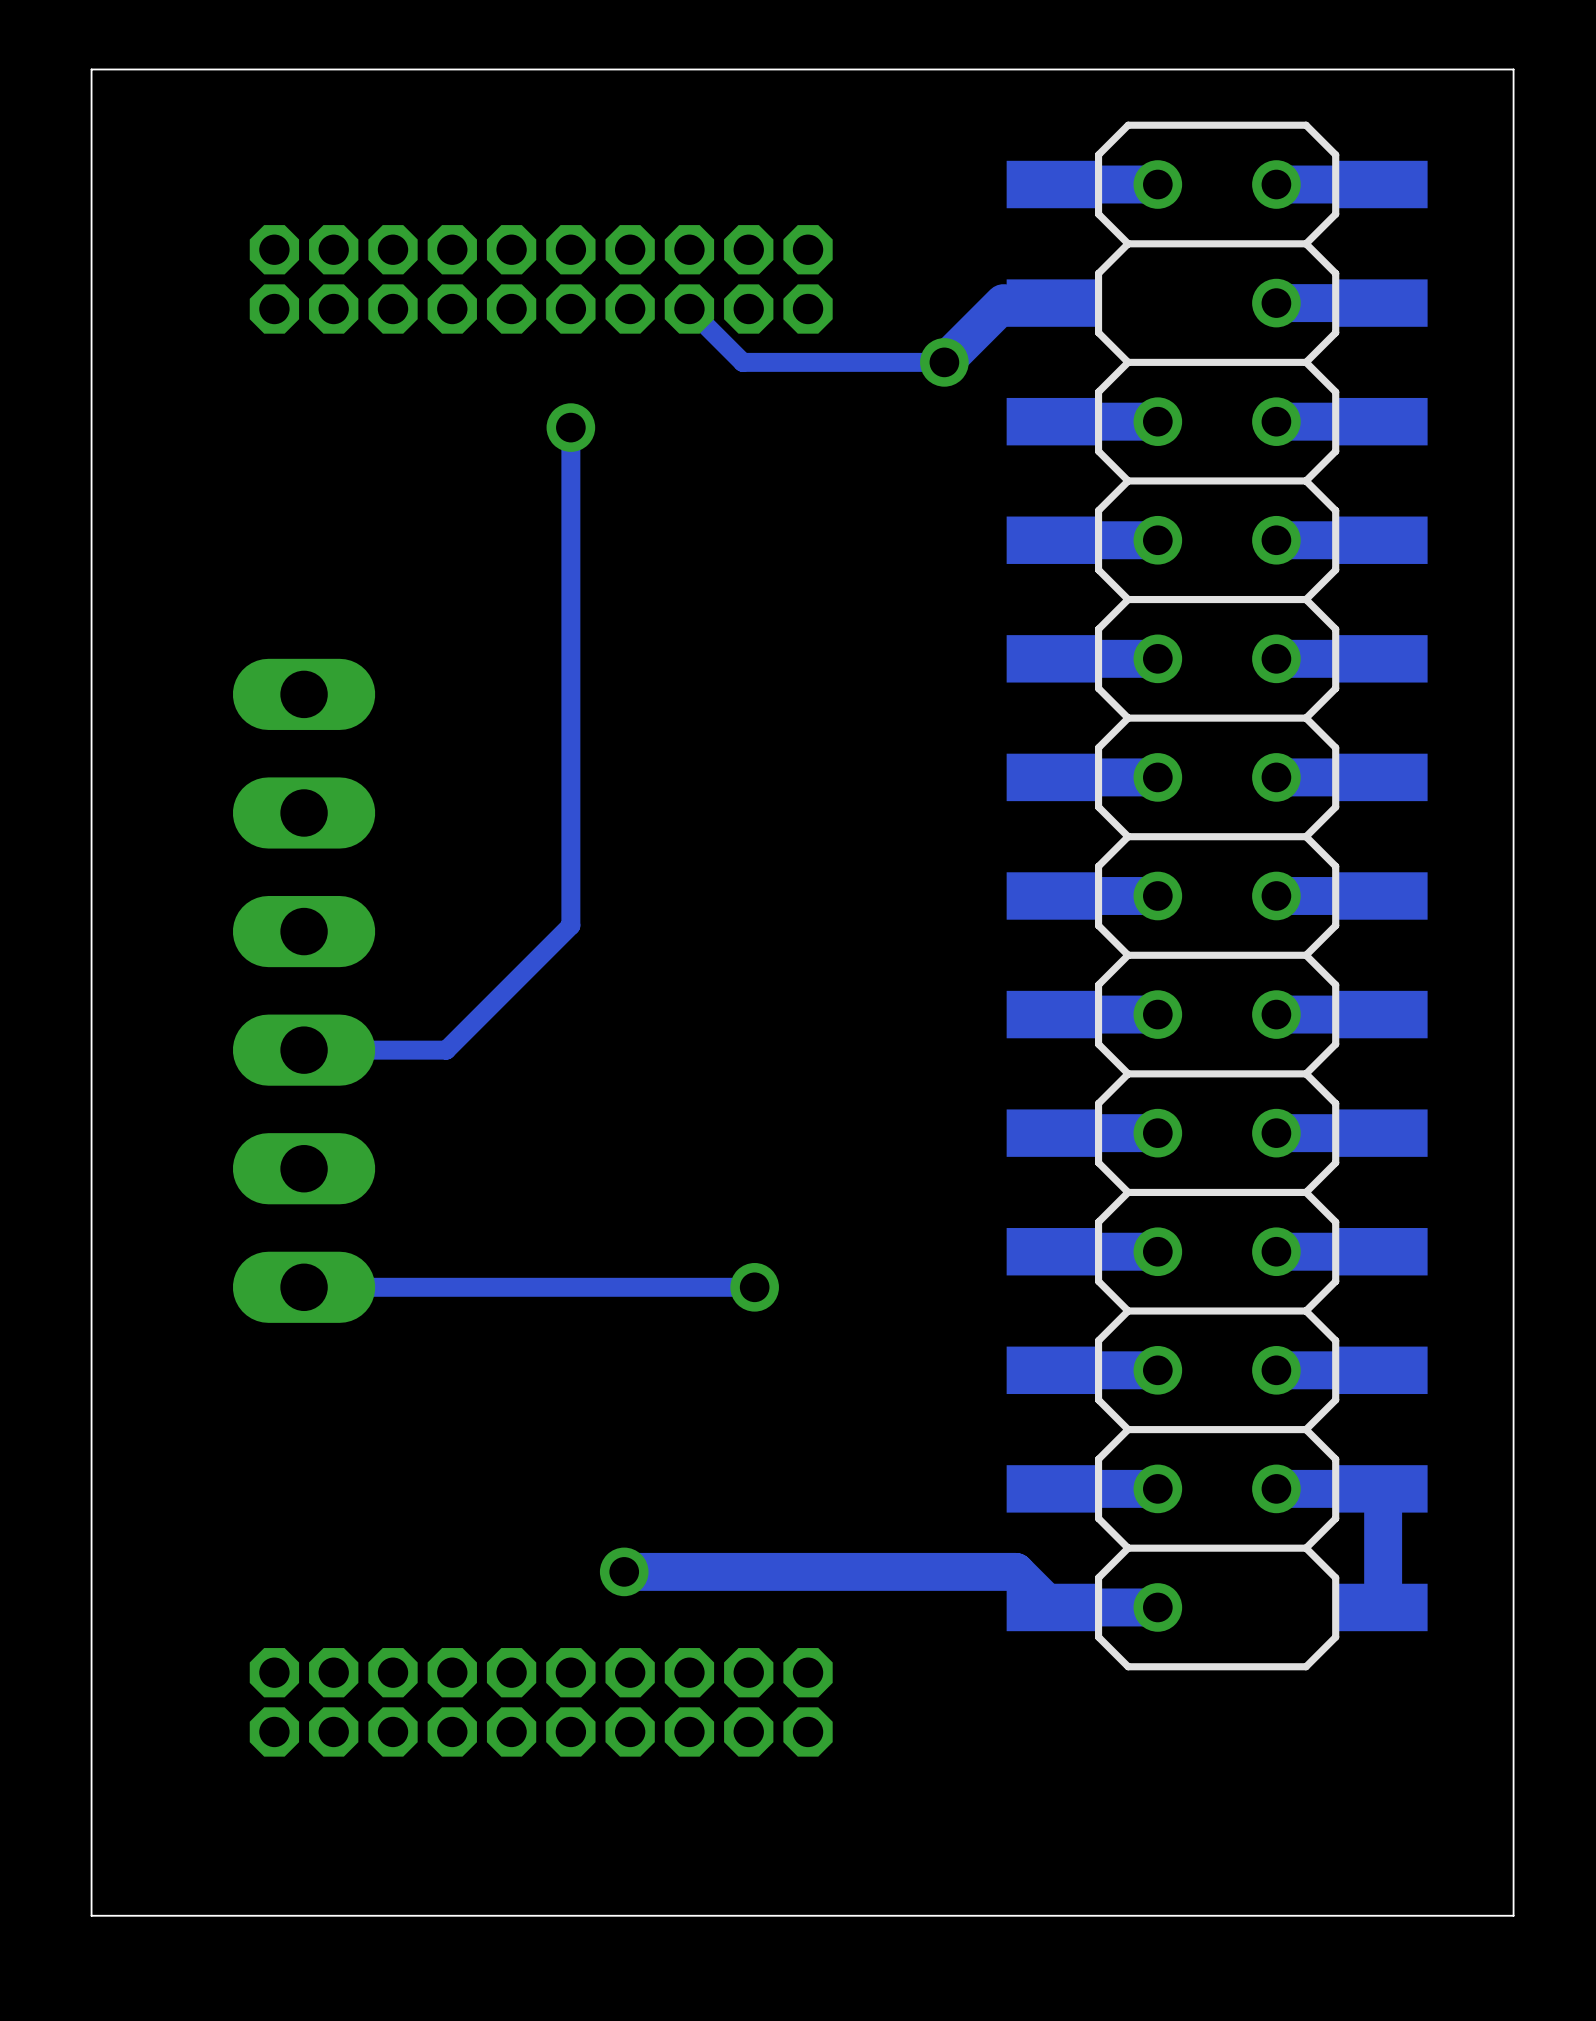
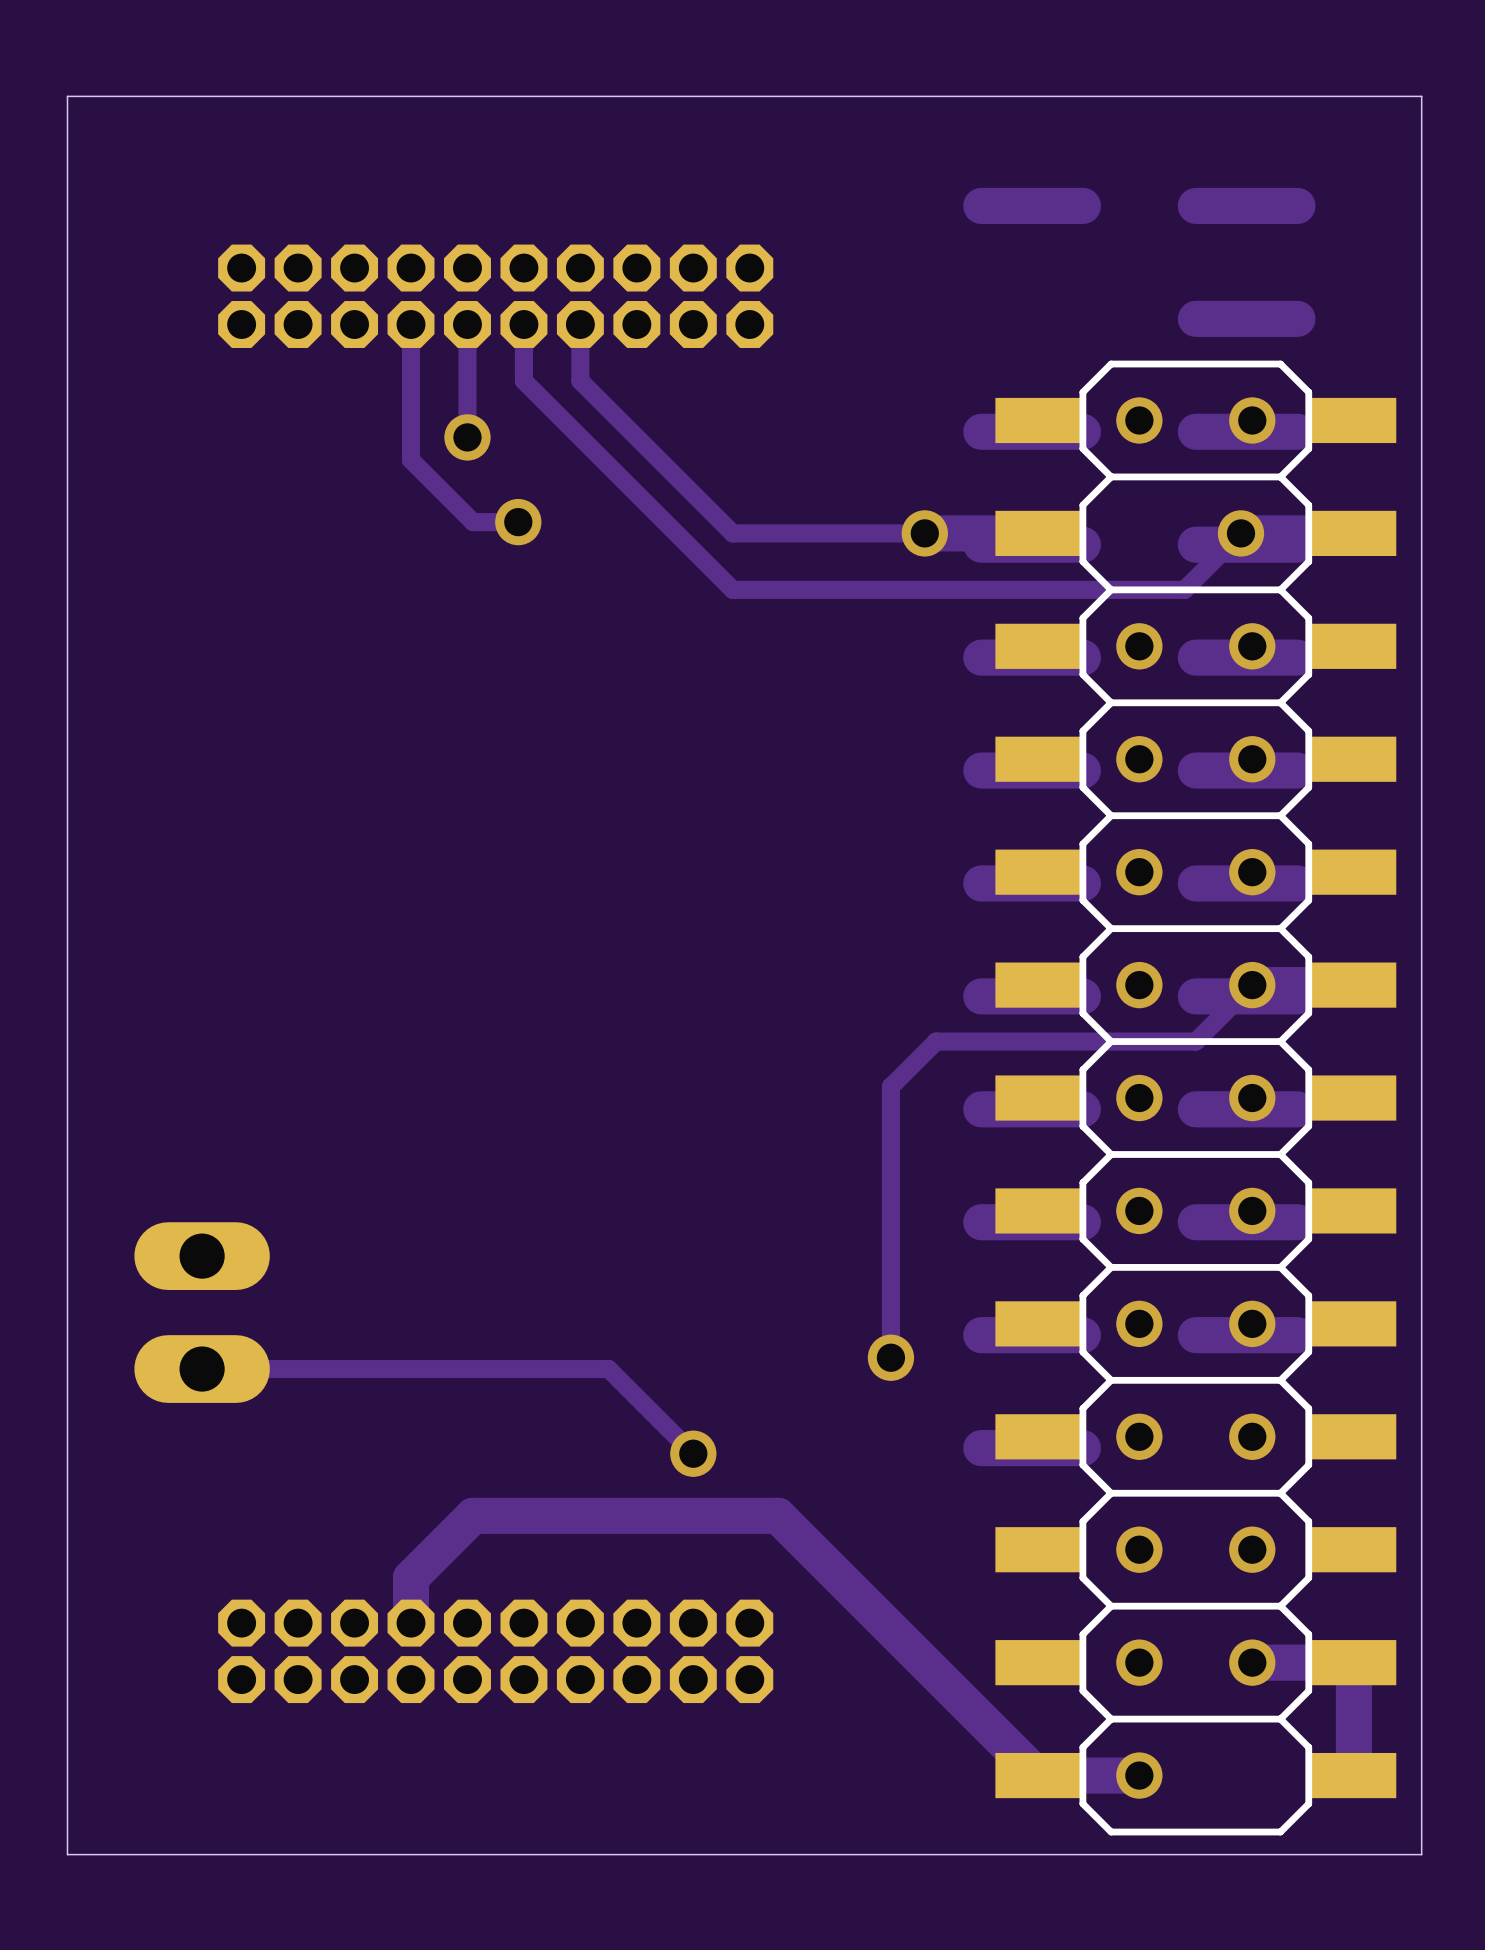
via: (1157, 184) -> none
via: (1276, 184) -> none
track: (1051, 303) (1003, 303) (944, 362) (742, 362) (689, 309) -> none
via: (1276, 303) -> none
track: none -> (411, 324) (411, 460) (473, 522) (518, 522)
track: none -> (467, 324) (467, 437)
track: none -> (523, 324) (523, 380) (732, 589) (1184, 589) (1241, 533) (1353, 533)
track: none -> (580, 324) (580, 380) (732, 533) (1037, 533)
via: (944, 362) -> none
via: none -> (1139, 420)
via: none -> (1252, 420)
via: (1157, 421) -> none
via: (1276, 421) -> none
via: none -> (467, 437)
track: (570, 427) (570, 925) (446, 1050) (304, 1050) -> none
via: (570, 427) -> none
via: none -> (518, 522)
via: none -> (924, 533)
via: (1157, 540) -> none
via position: (1276, 540) -> (1241, 533)
via: none -> (1139, 646)
via: none -> (1252, 646)
via: (1157, 658) -> none
via: (1276, 658) -> none
via: none -> (1139, 759)
via: none -> (1252, 759)
via: (1157, 777) -> none
via: (1276, 777) -> none
via: none -> (1139, 872)
via: none -> (1252, 872)
via: (1157, 895) -> none
part position: (1217, 895) -> (1195, 1098)
via: (1276, 895) -> none
part: (304, 990) -> none
via: none -> (1139, 985)
via: none -> (1252, 985)
track: none -> (1353, 985) (1252, 985) (1195, 1041) (936, 1041) (890, 1086) (890, 1357)
via: (1157, 1014) -> none
via: (1276, 1014) -> none
via: none -> (1139, 1098)
via: none -> (1252, 1098)
via: (1157, 1133) -> none
via: (1276, 1133) -> none
via: none -> (1139, 1210)
via: none -> (1252, 1210)
via: (1157, 1251) -> none
via: (1276, 1251) -> none
track: (754, 1287) (304, 1287) -> none
via: (754, 1287) -> none
part: none -> (202, 1312)
via: none -> (1139, 1323)
via: none -> (1252, 1323)
via: (1157, 1370) -> none
via: (1276, 1370) -> none
via: none -> (890, 1357)
track: none -> (202, 1369) (608, 1369) (693, 1453)
via: none -> (1139, 1436)
via: none -> (1252, 1436)
via: (1157, 1488) -> none
track: (1276, 1488) (1383, 1488) (1383, 1607) -> (1252, 1662) (1353, 1662) (1353, 1775)
via: (1276, 1488) -> none
via: none -> (693, 1453)
track: (624, 1571) (1015, 1571) (1051, 1607) (1157, 1607) -> none
via: (624, 1571) -> none
via: none -> (1252, 1549)
via position: (1157, 1607) -> (1139, 1549)
track: none -> (411, 1623) (411, 1577) (473, 1515) (778, 1515) (1037, 1775) (1139, 1775)
via: none -> (1139, 1662)
via: none -> (1252, 1662)
via: none -> (1139, 1775)

